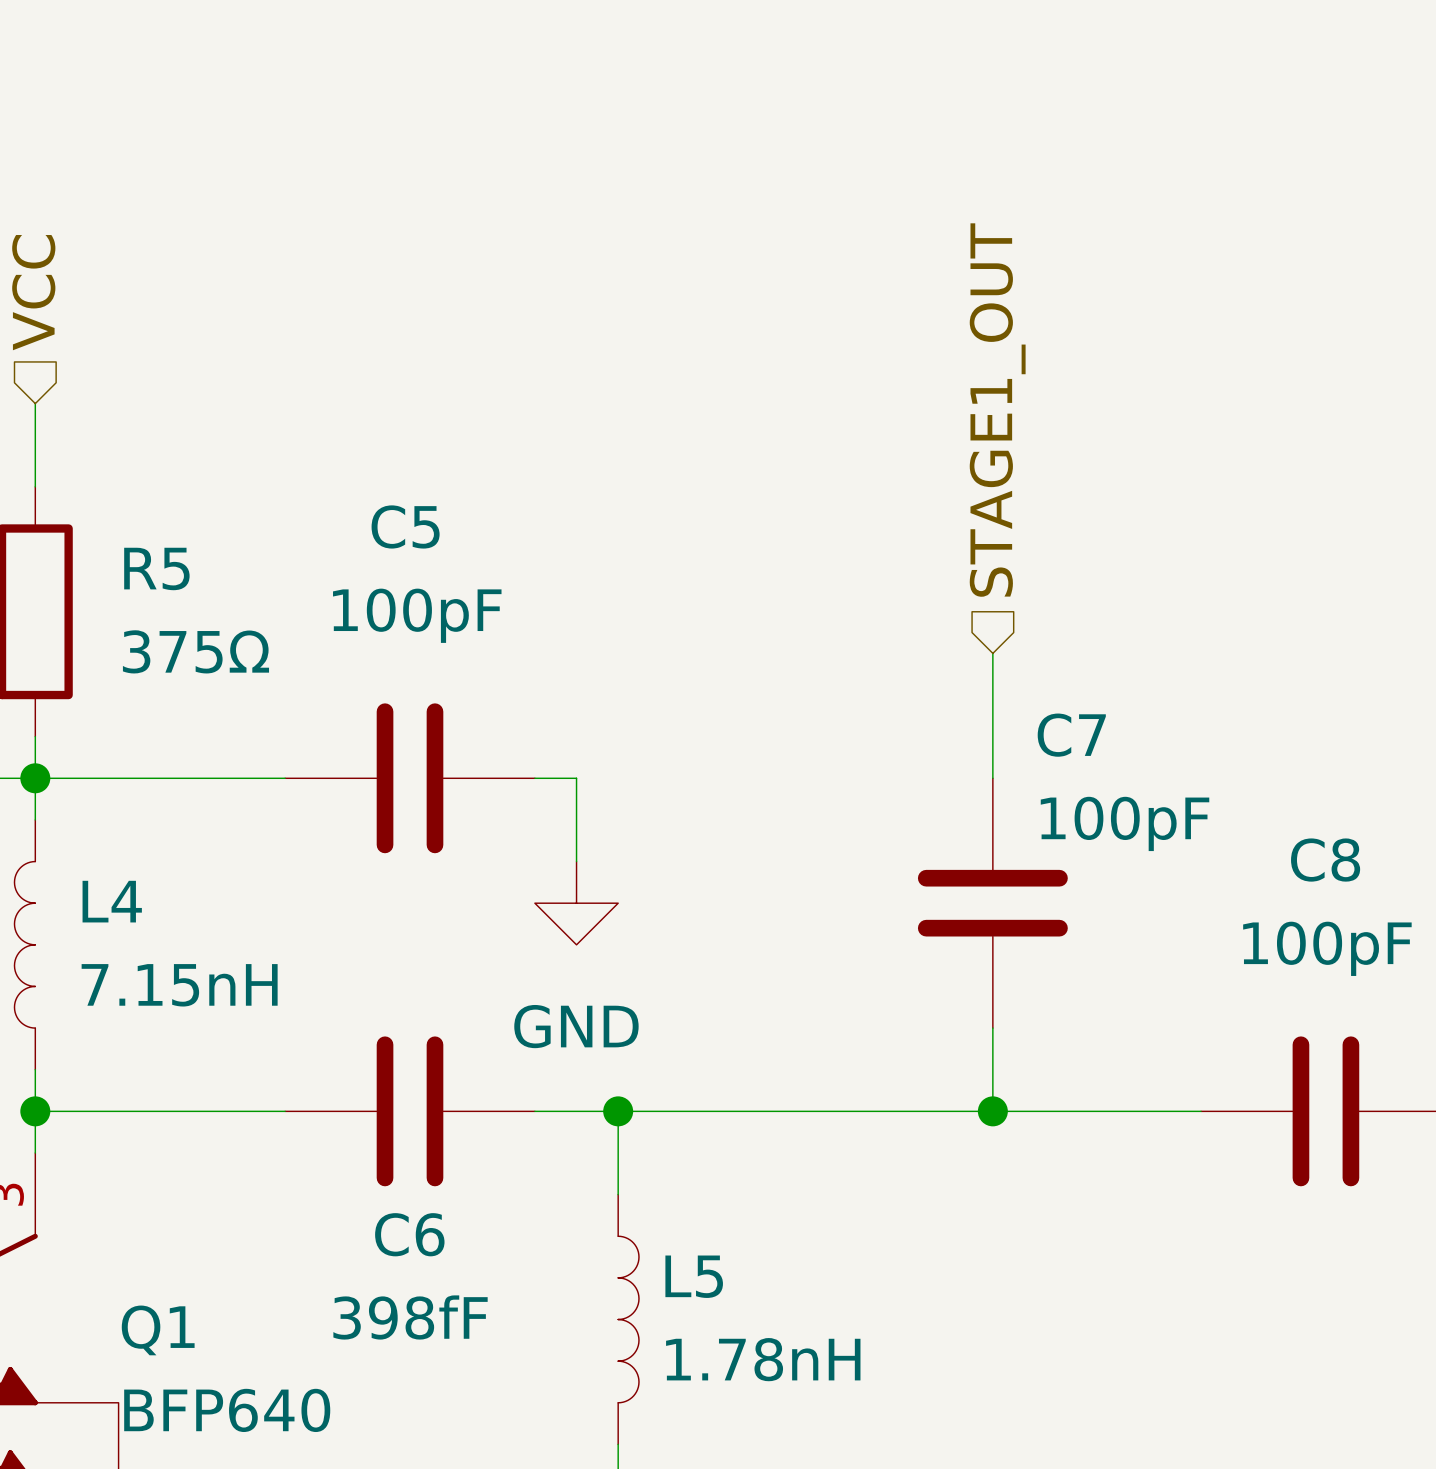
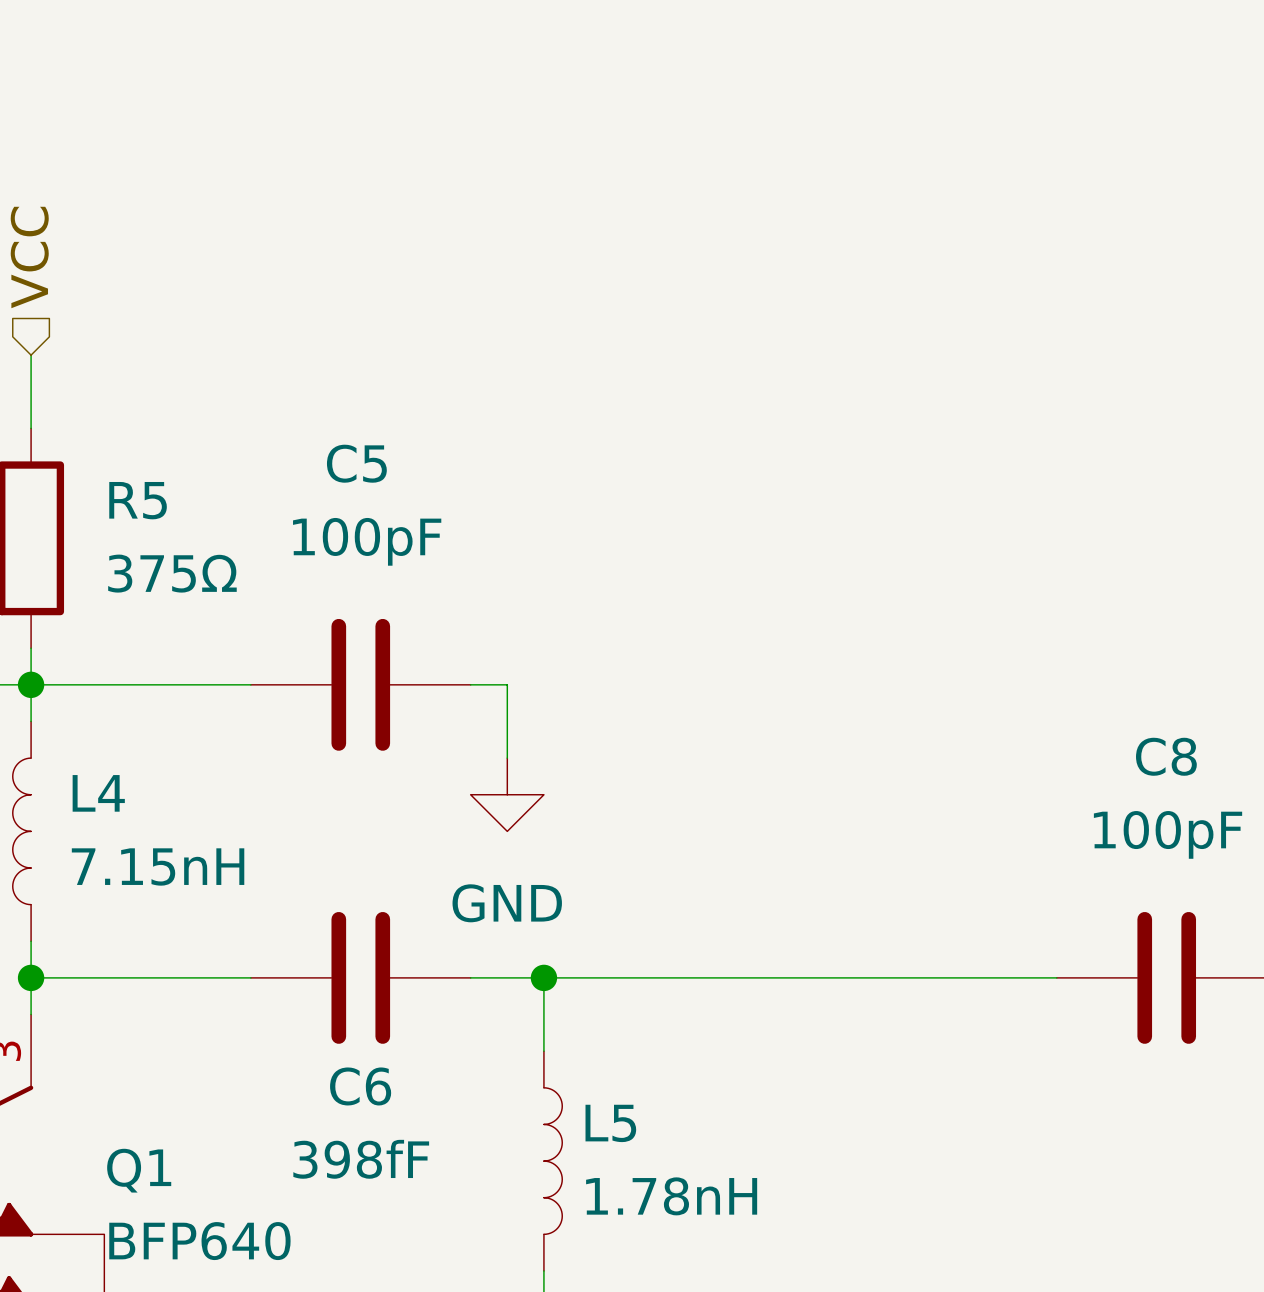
hierarchical label: STAGE1_OUT (997, 410) -> none
wire: (992, 653) (992, 778) -> none
C7: 100pF (992, 903) -> none
wire: (992, 1028) (992, 1111) -> none
junction: (992, 1111) -> none

